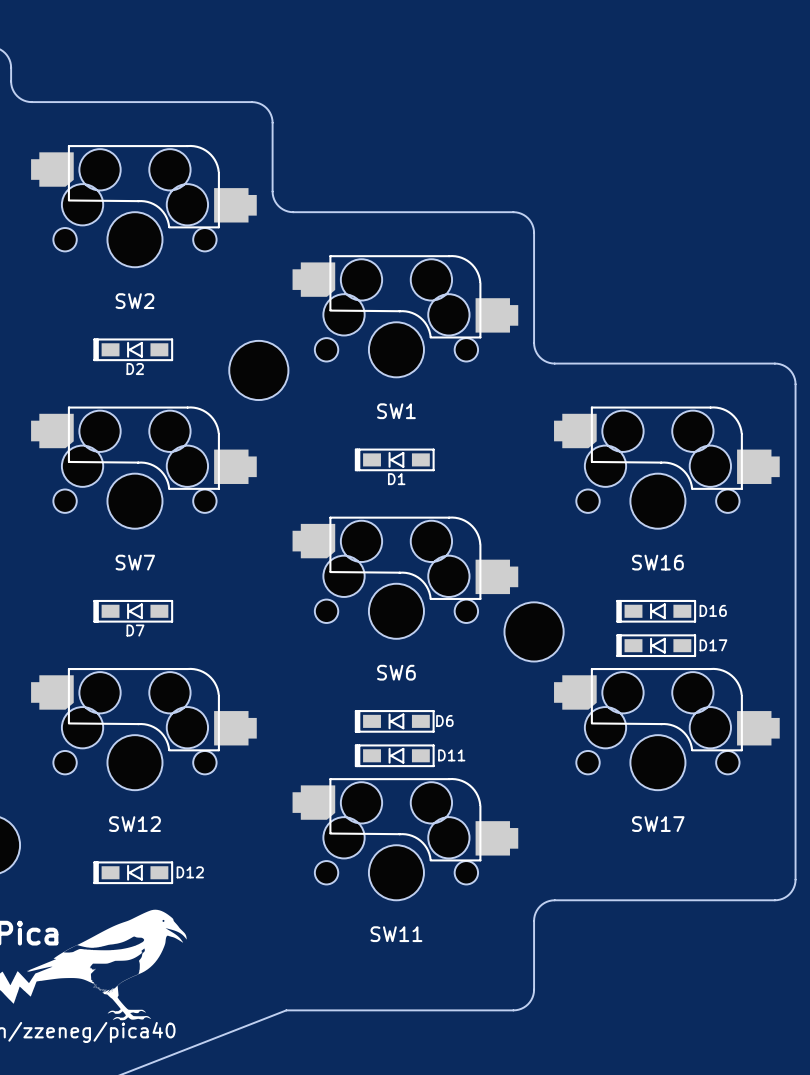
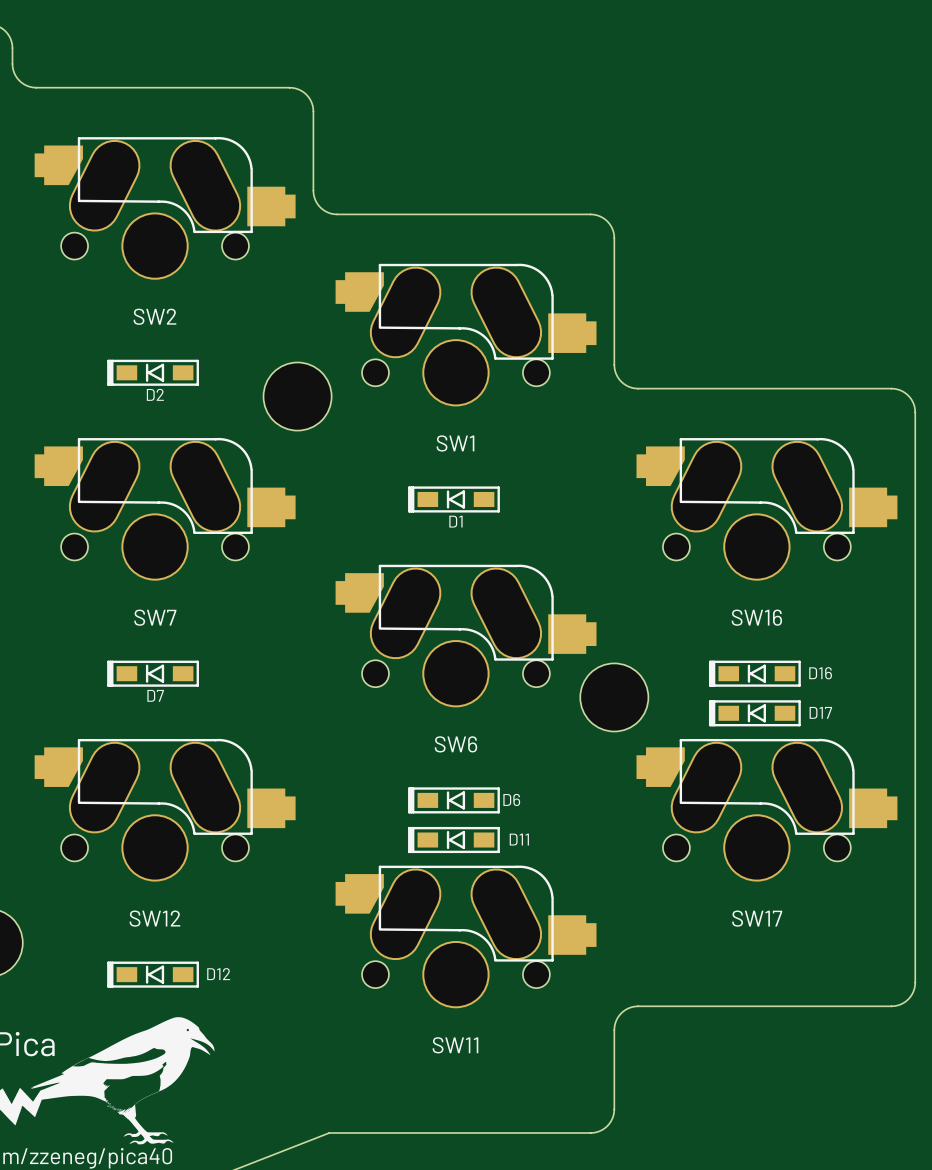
SW2 footprint: [31, 144, 257, 268] -> [34, 137, 296, 280]
SW1 footprint: [292, 255, 519, 378] -> [335, 263, 597, 407]
SW7 footprint: [31, 406, 257, 529] -> [34, 437, 296, 581]
SW16 footprint: [554, 406, 780, 529] -> [636, 437, 898, 581]
SW6 footprint: [292, 516, 519, 639] -> [335, 564, 597, 708]
SW12 footprint: [31, 667, 257, 791] -> [34, 738, 296, 882]
SW17 footprint: [554, 667, 780, 791] -> [636, 738, 898, 882]
SW11 footprint: [292, 777, 519, 901] -> [335, 865, 597, 1009]

